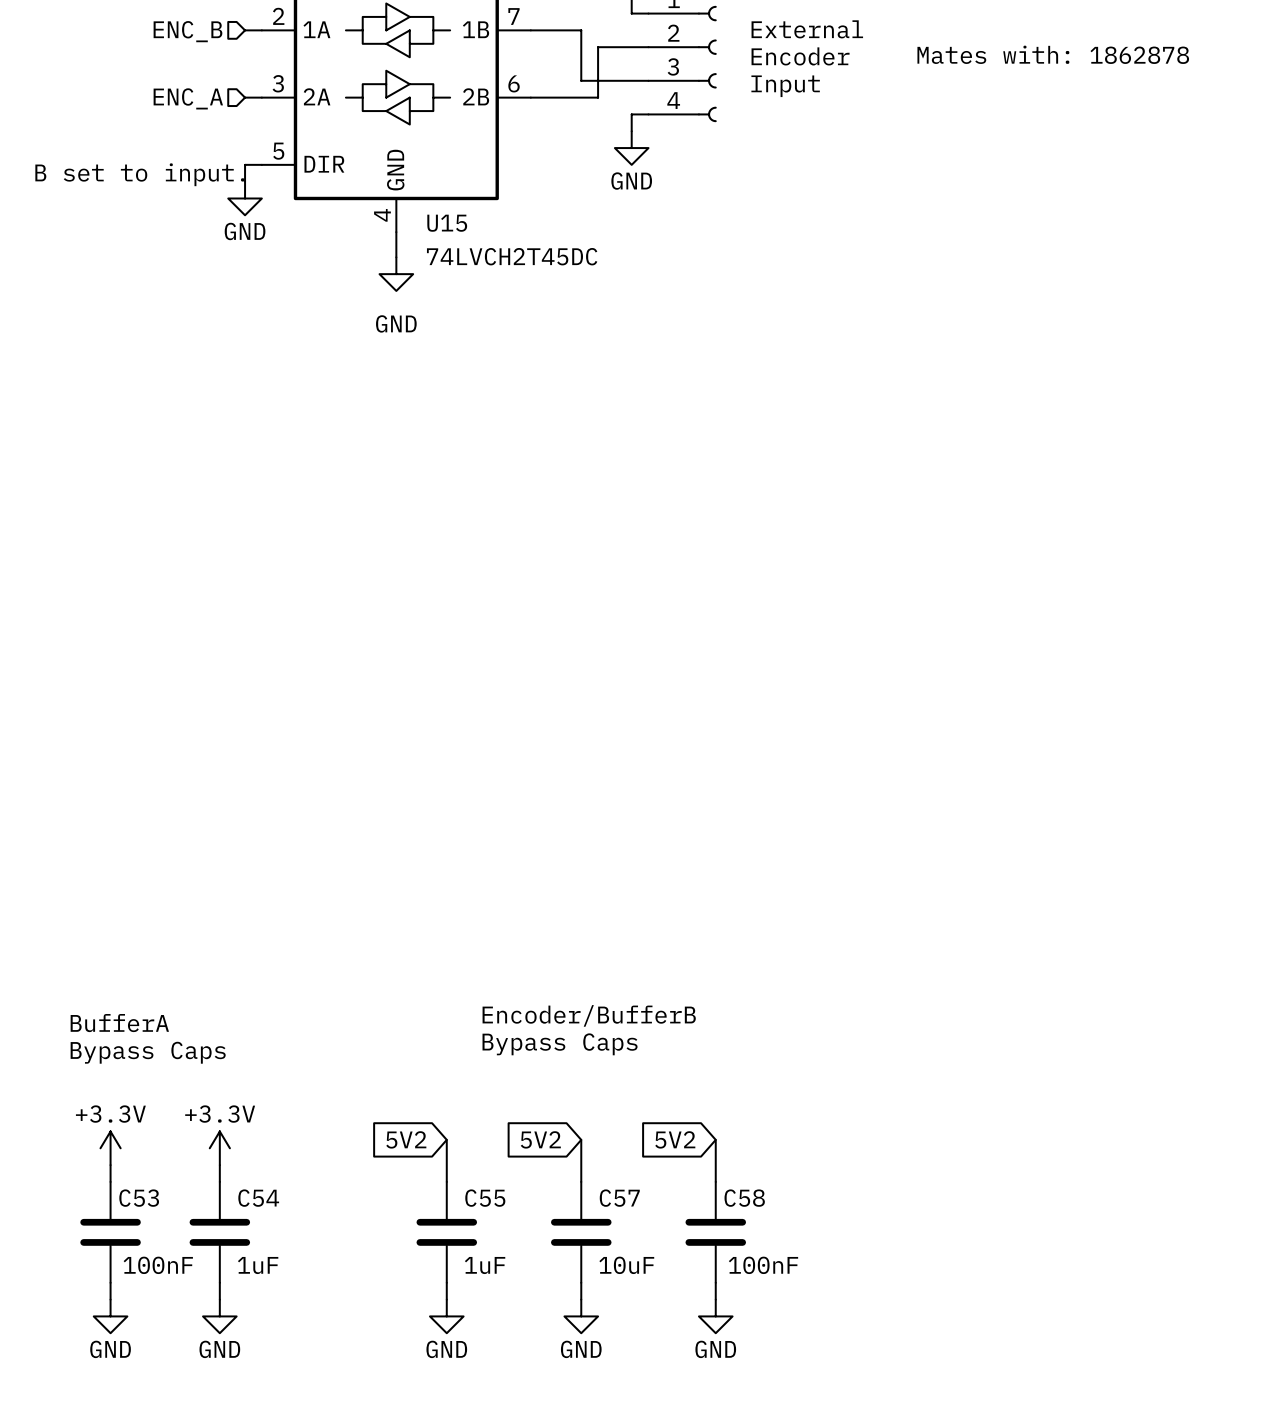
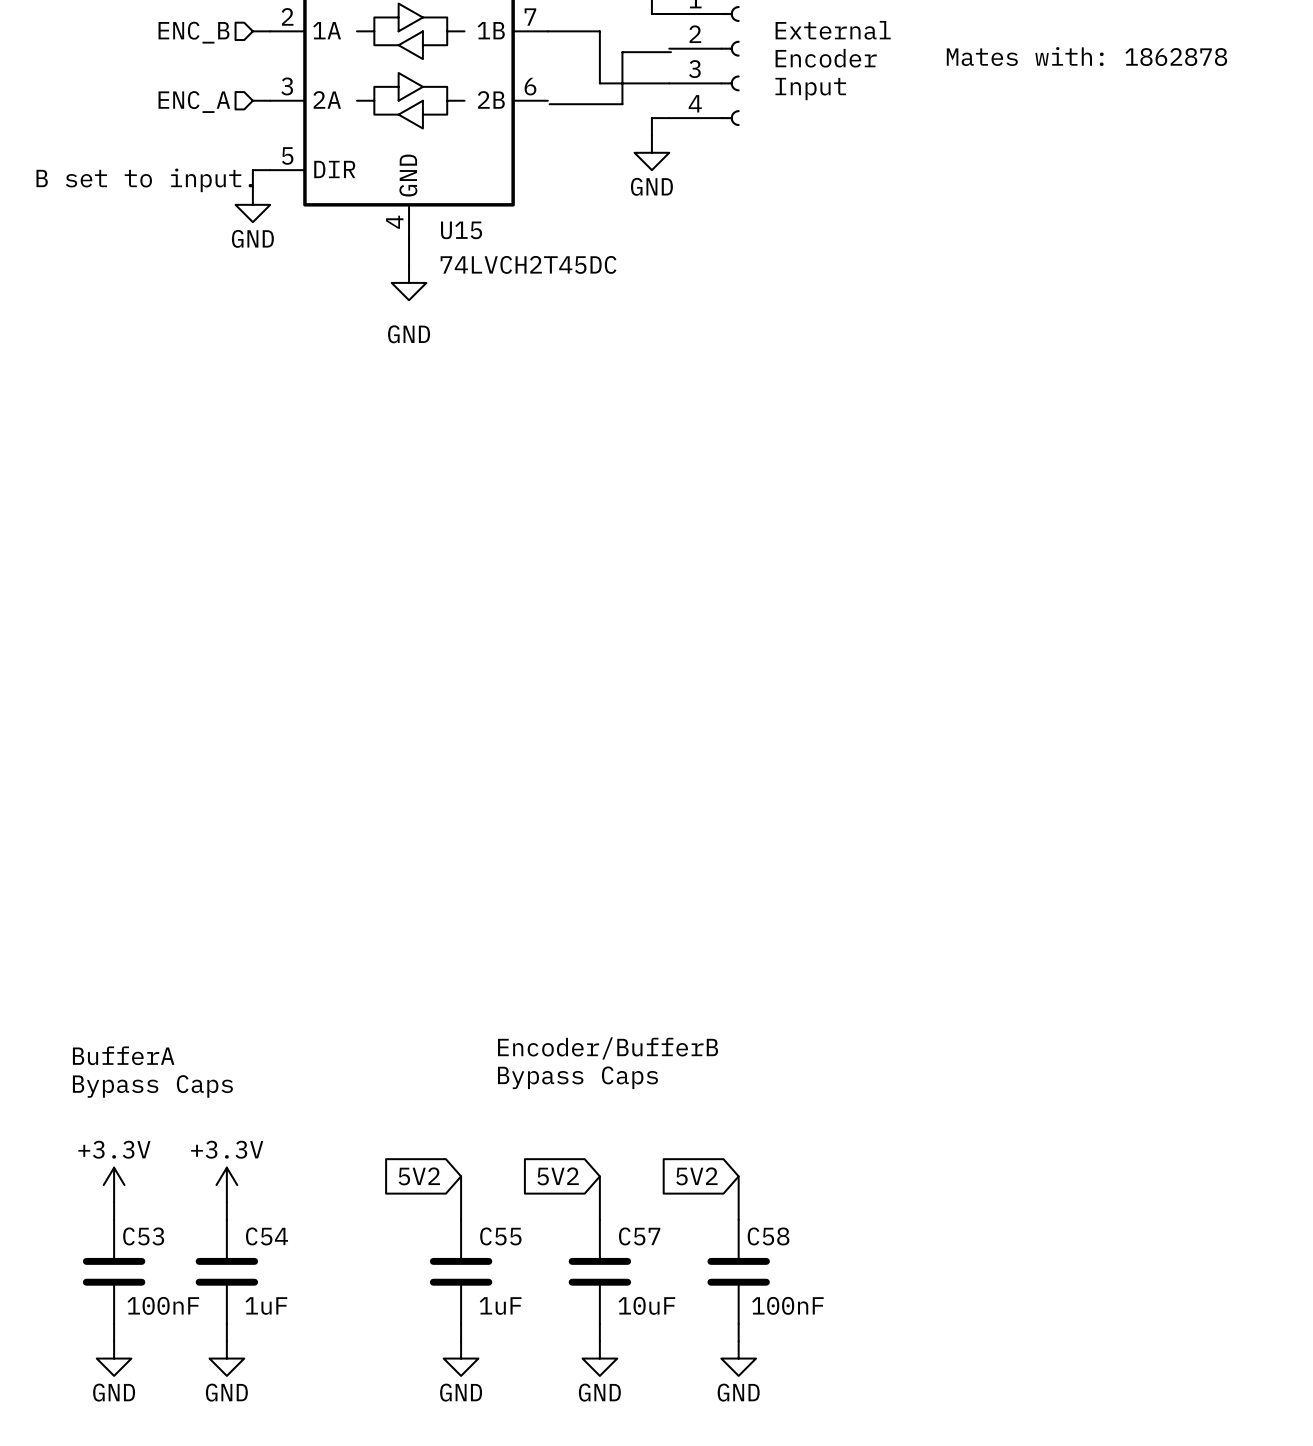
wire: (648, 47) (598, 47) (598, 97) (530, 97) -> none
wire: none -> (671, 52) (622, 52) (622, 104) (549, 104)

